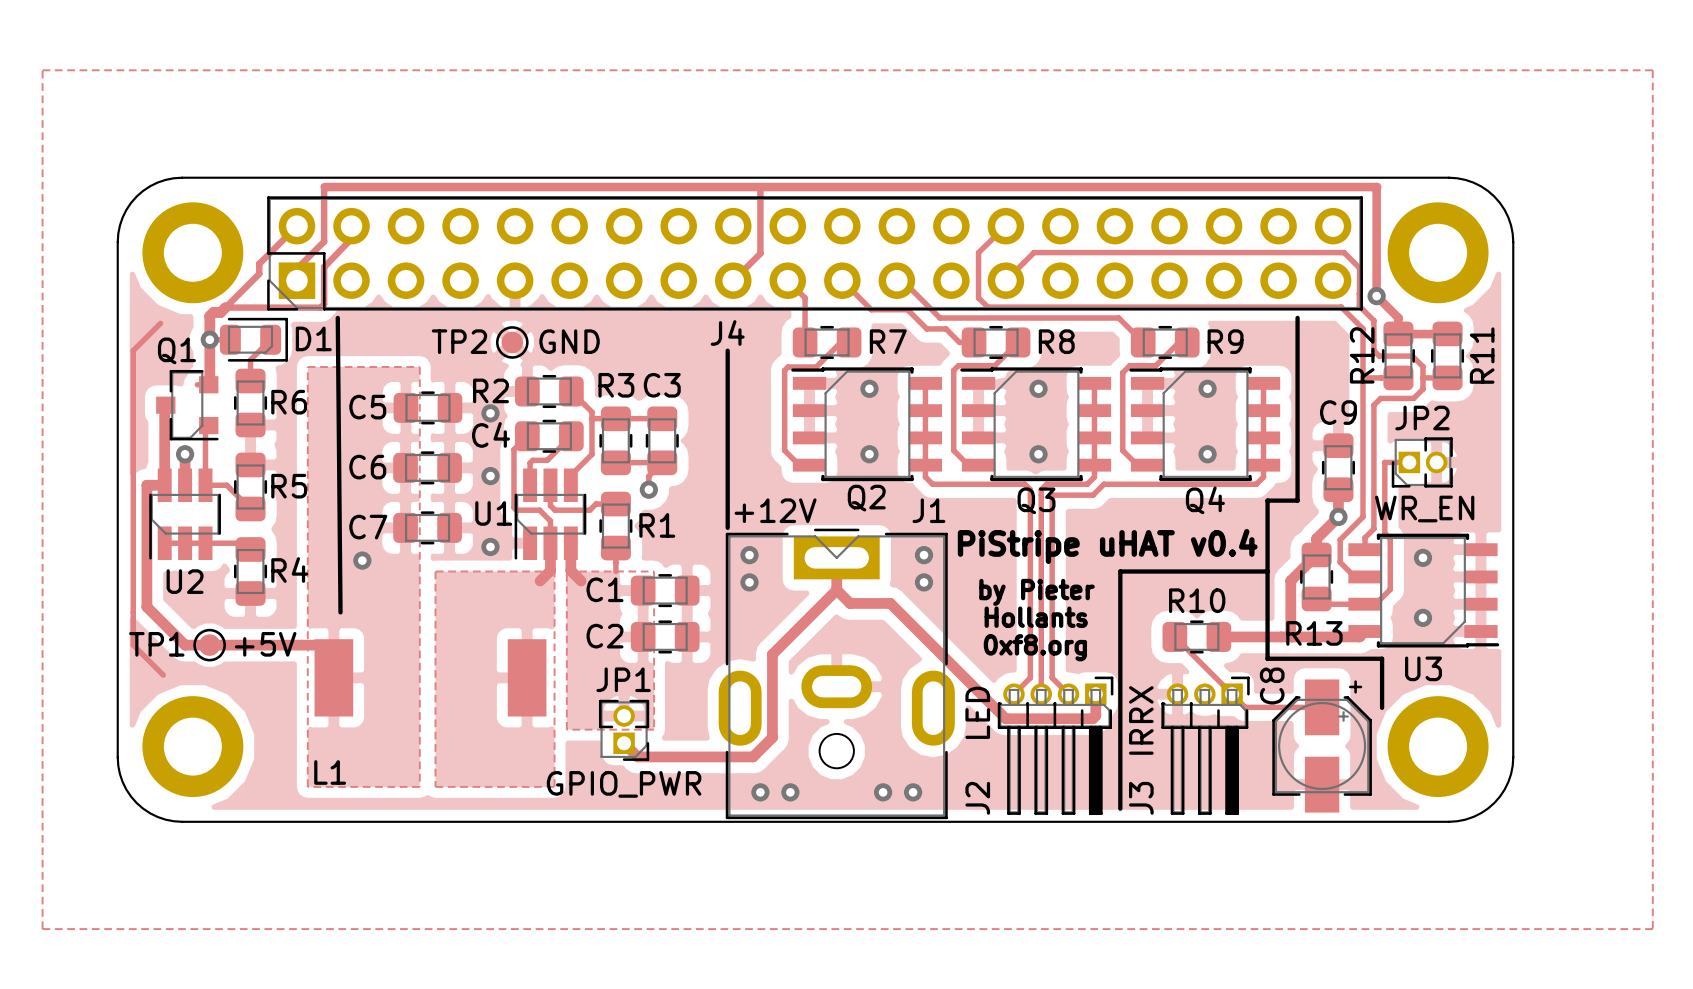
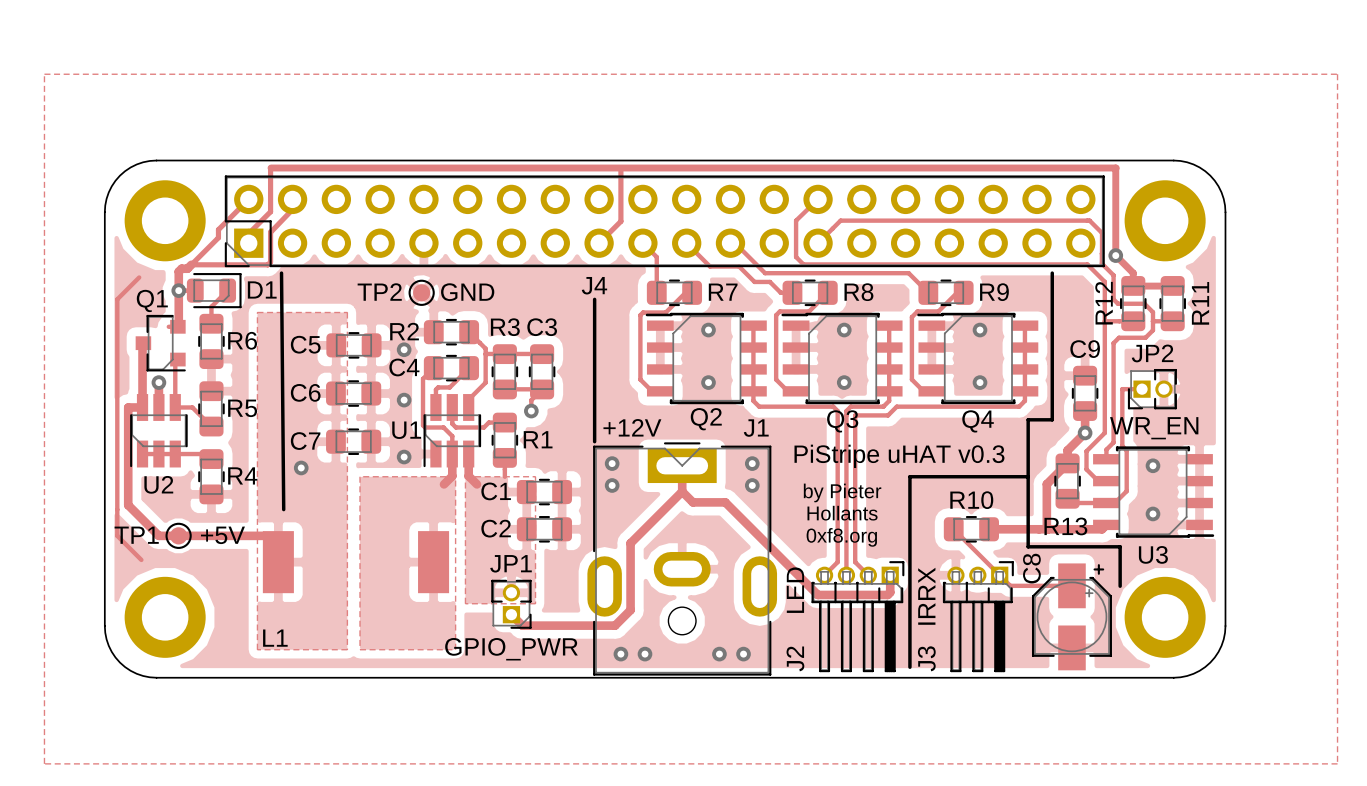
text: PiStripe uHAT v0.4 (1107, 546) -> PiStripe uHAT v0.3 (899, 456)

